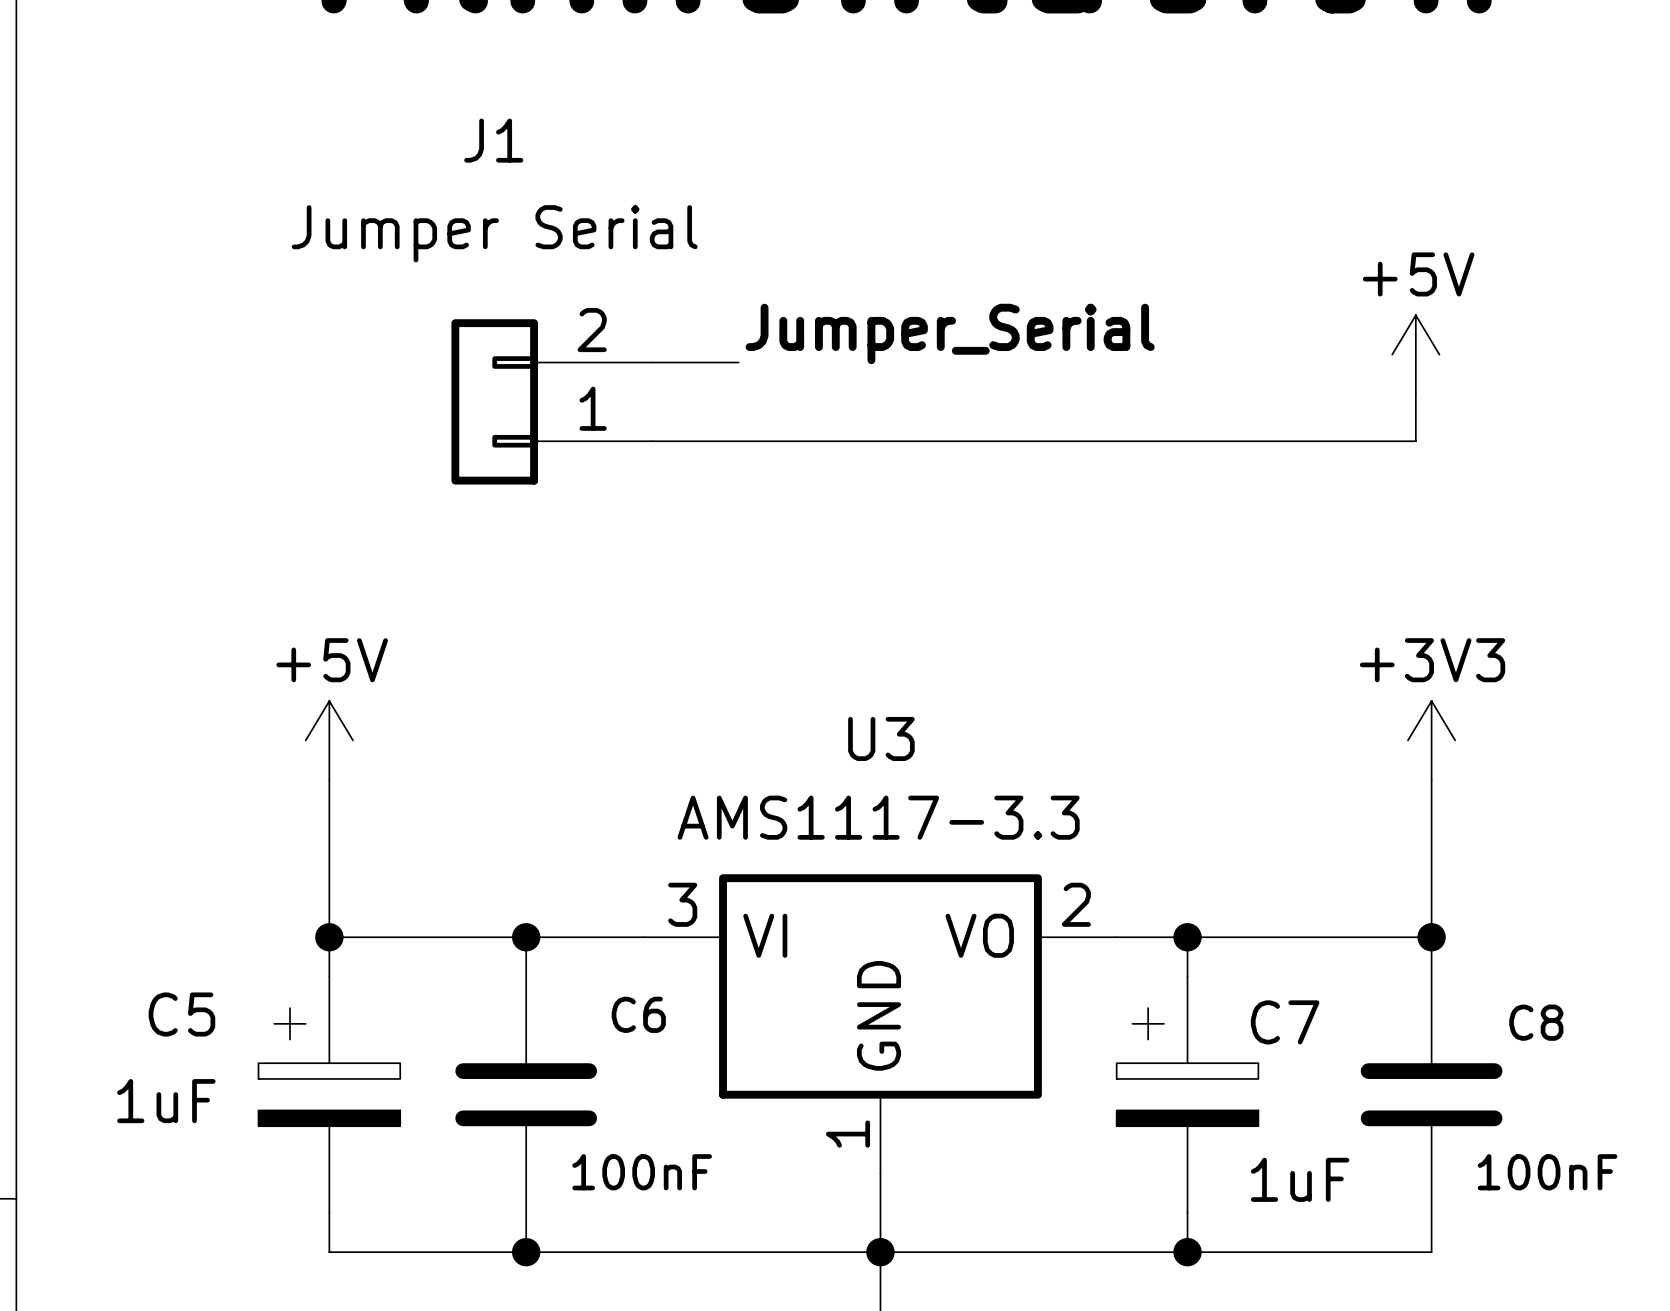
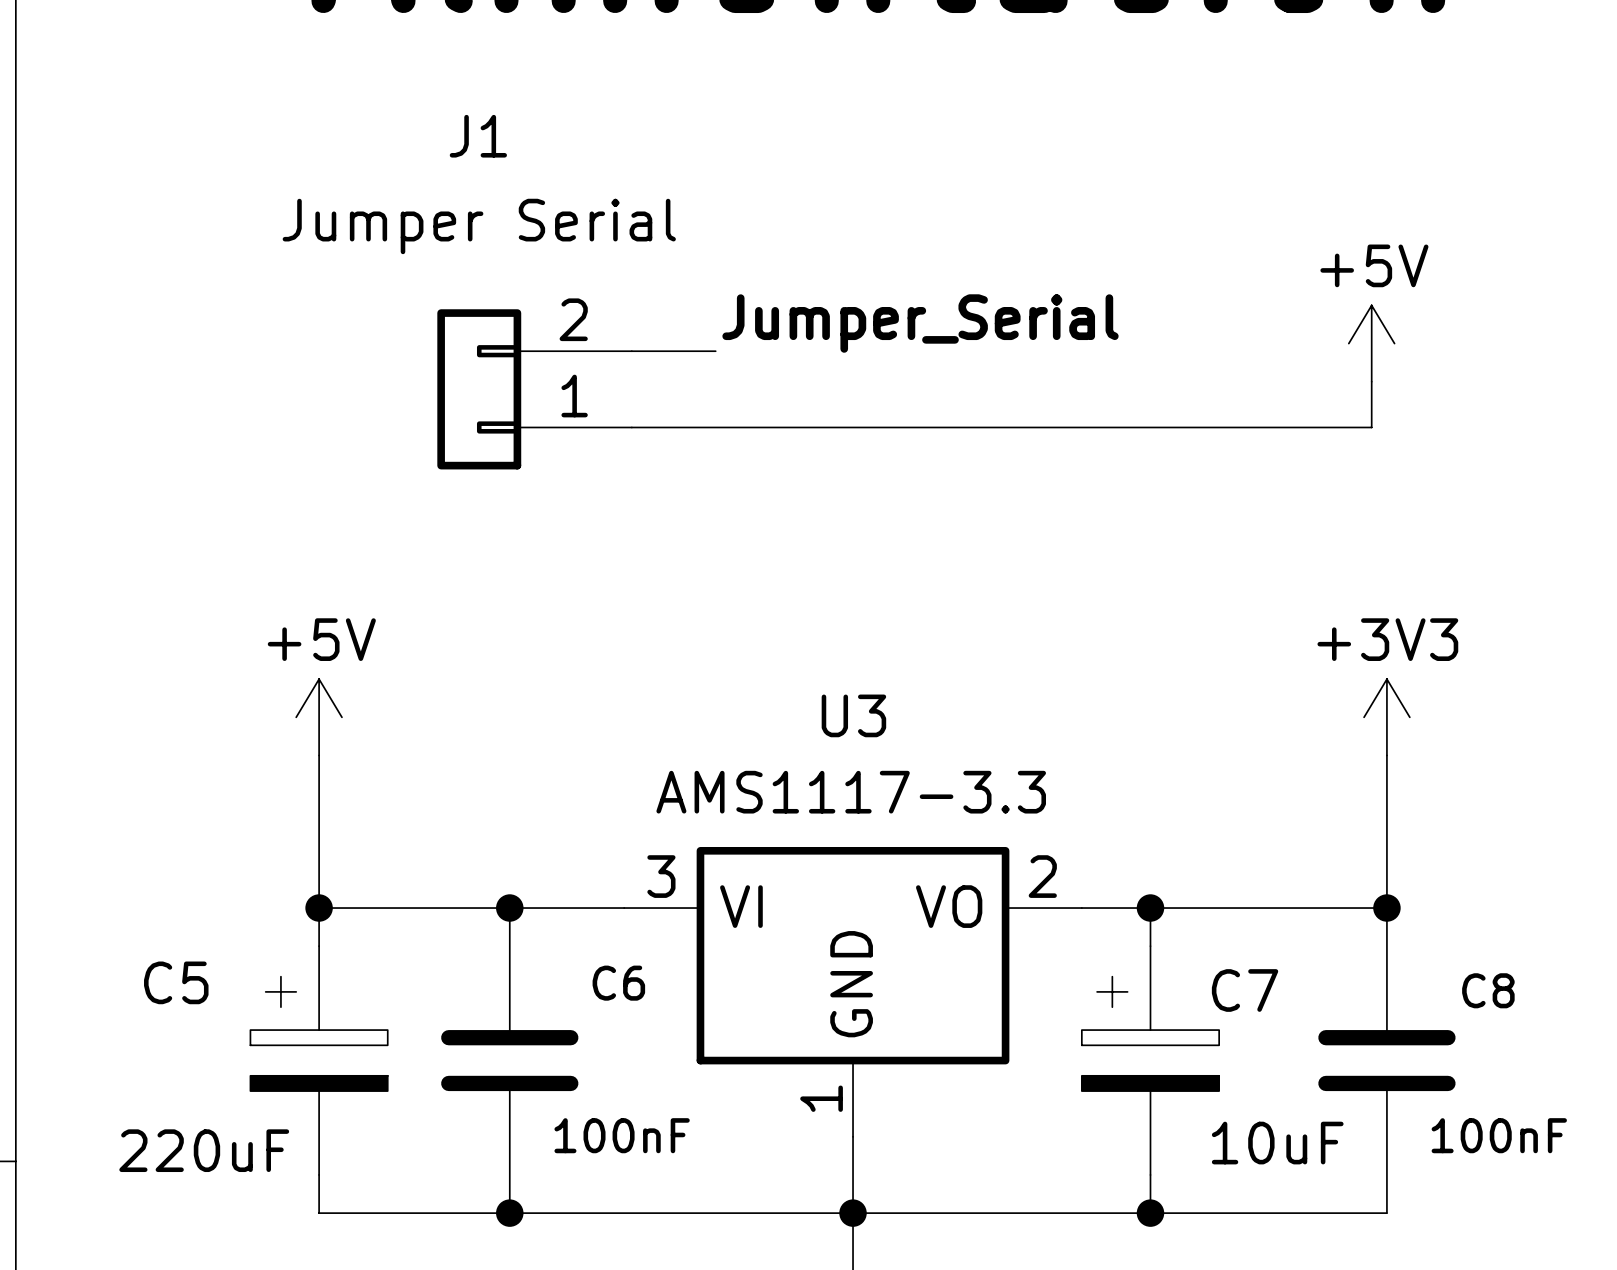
C5 value: 1uF (166, 1101) -> 220uF (204, 1150)
C7 value: 1uF (1300, 1179) -> 10uF (1277, 1143)

